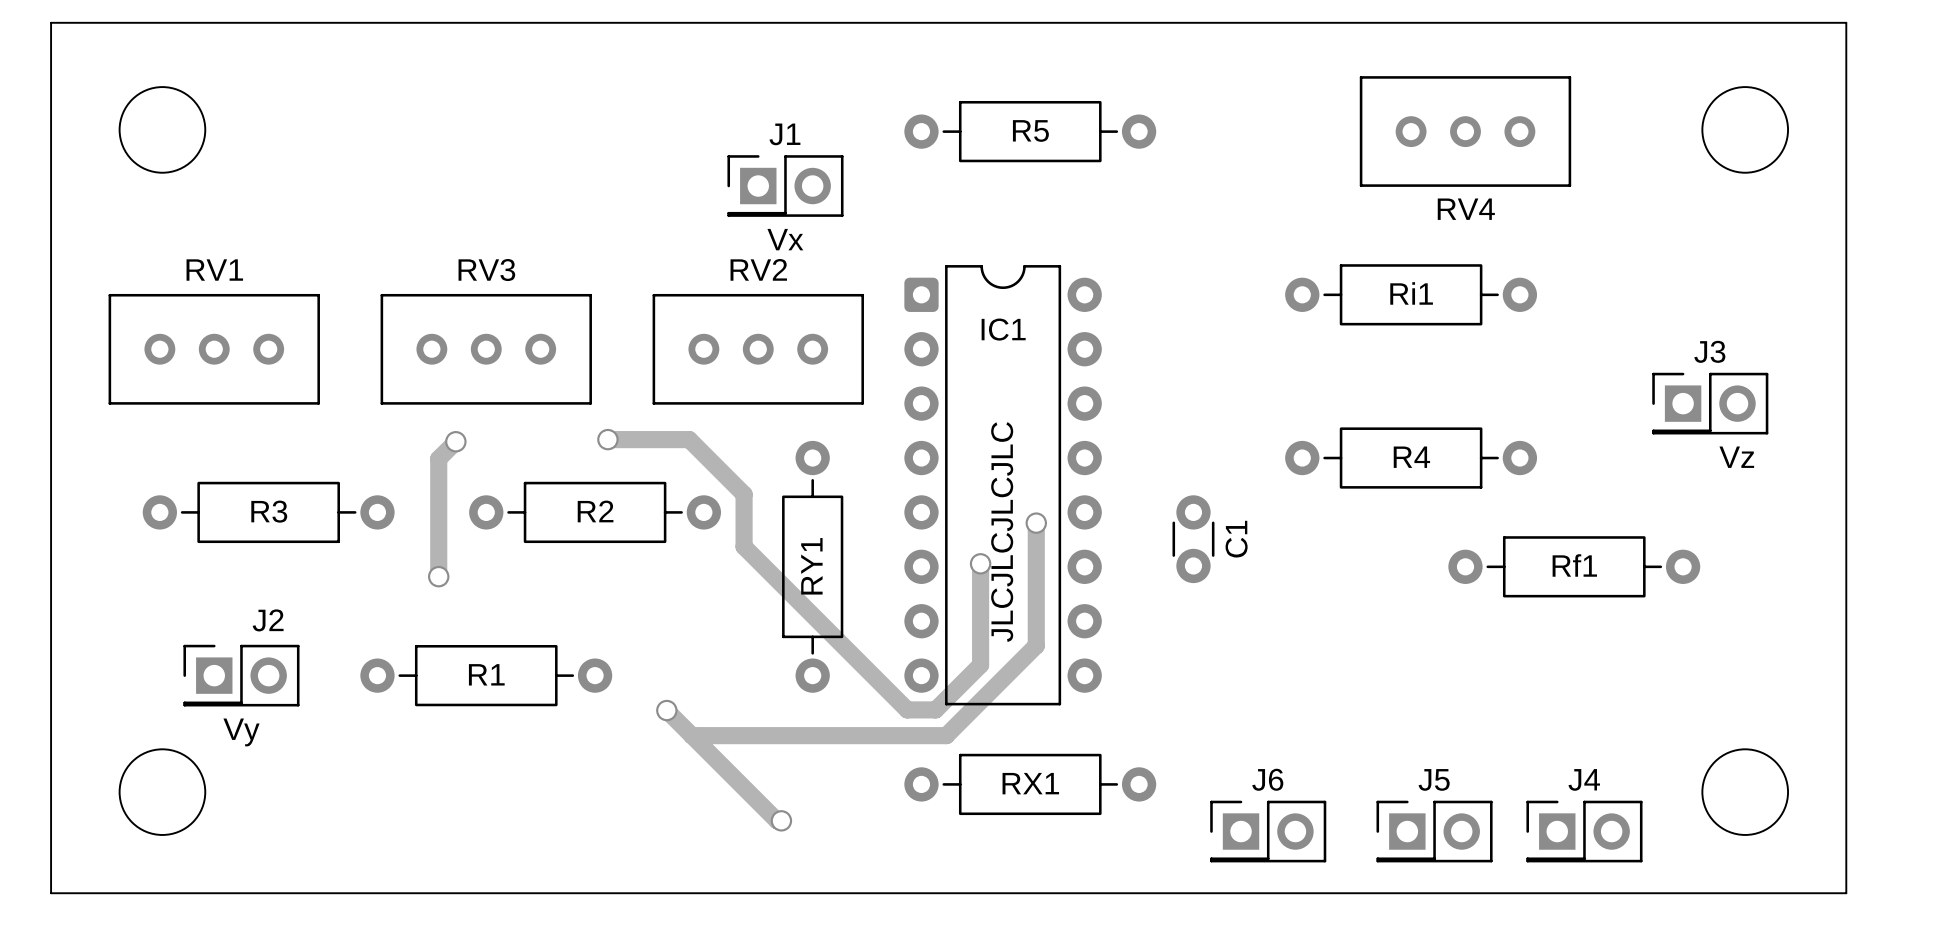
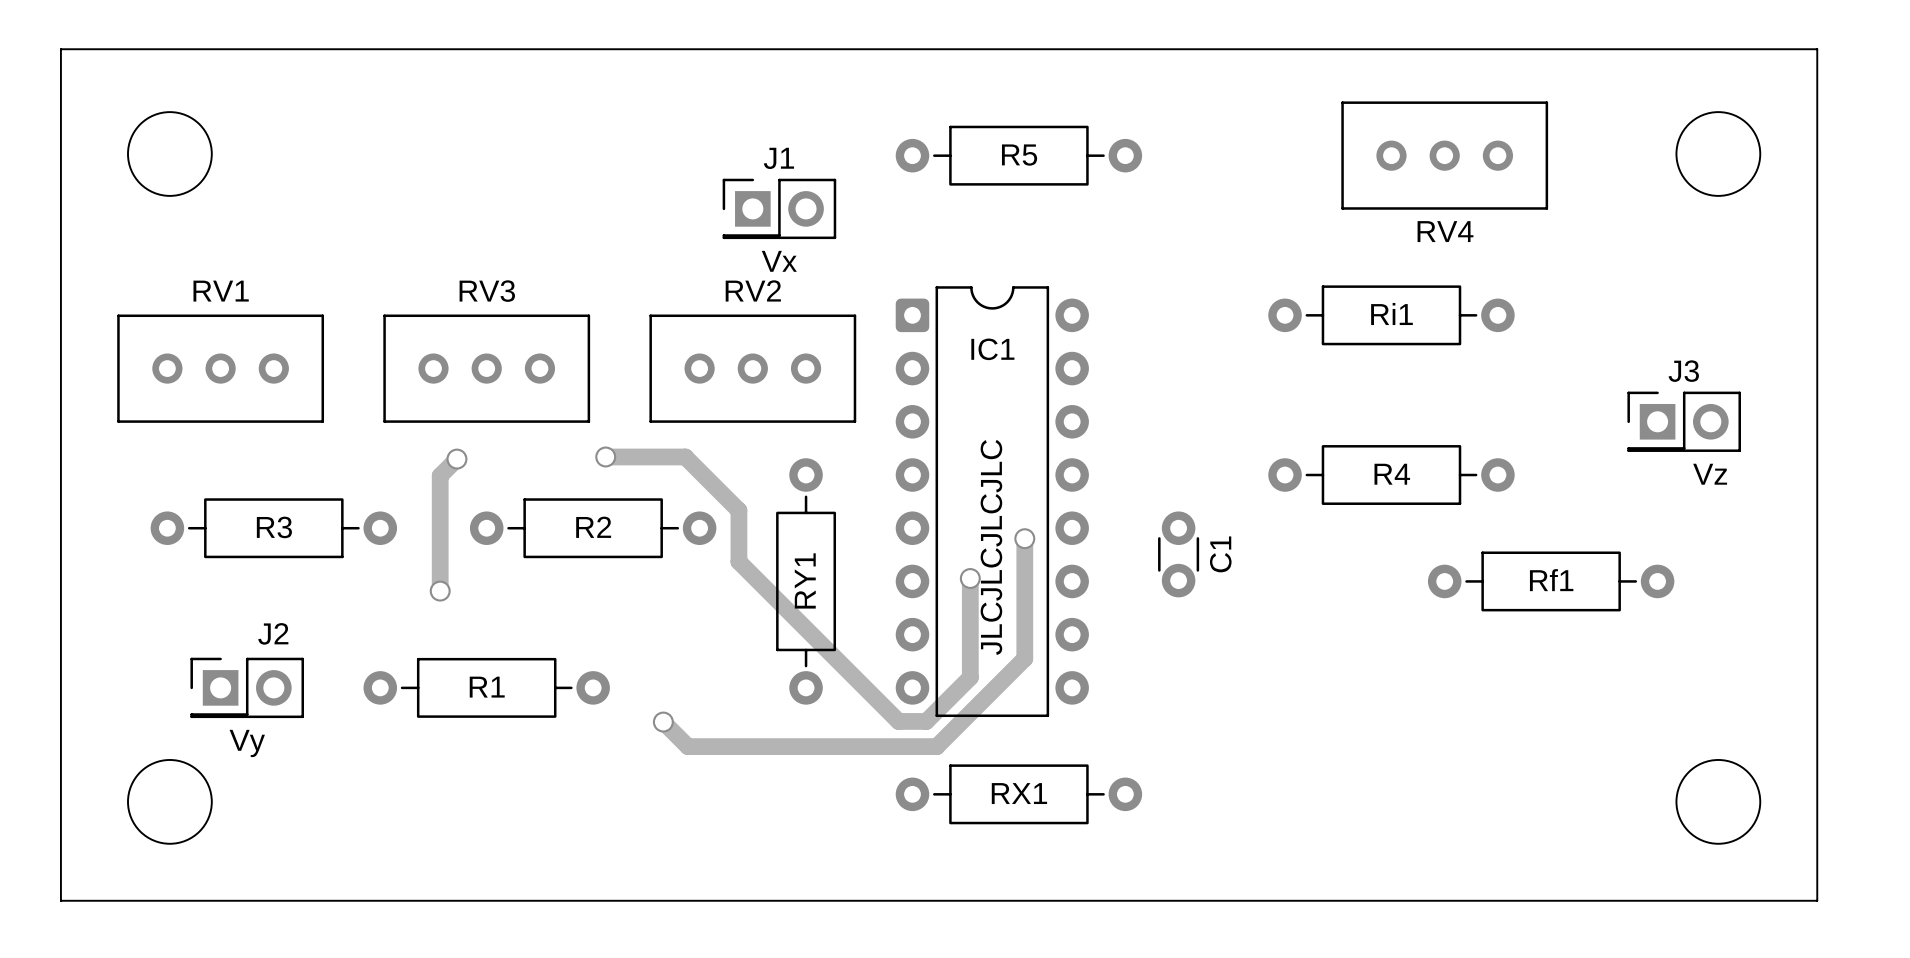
track: (691, 735) (777, 820) (781, 820) -> none
via: (781, 820) -> none
J6: (1268, 831) -> none
J5: (1434, 831) -> none
J4: (1584, 831) -> none

